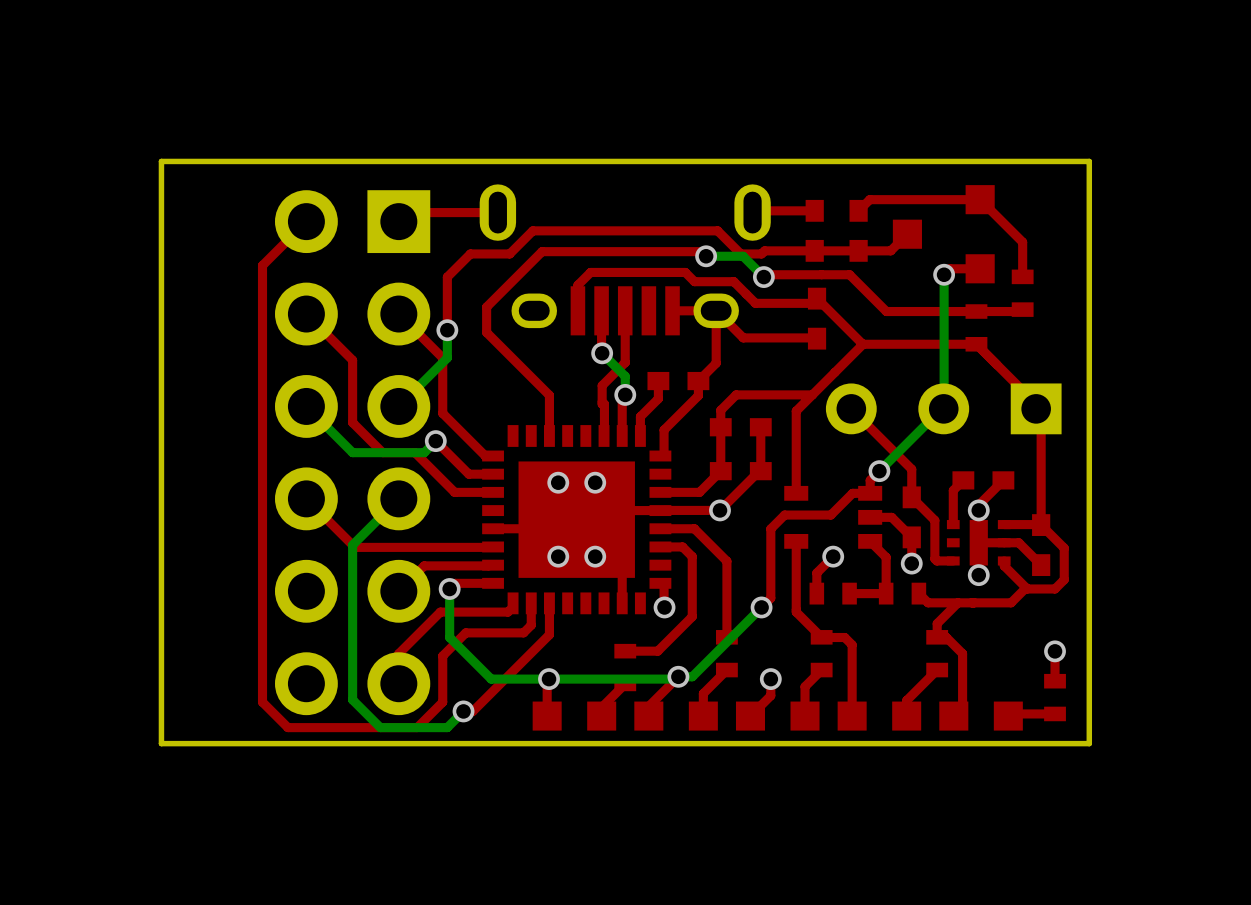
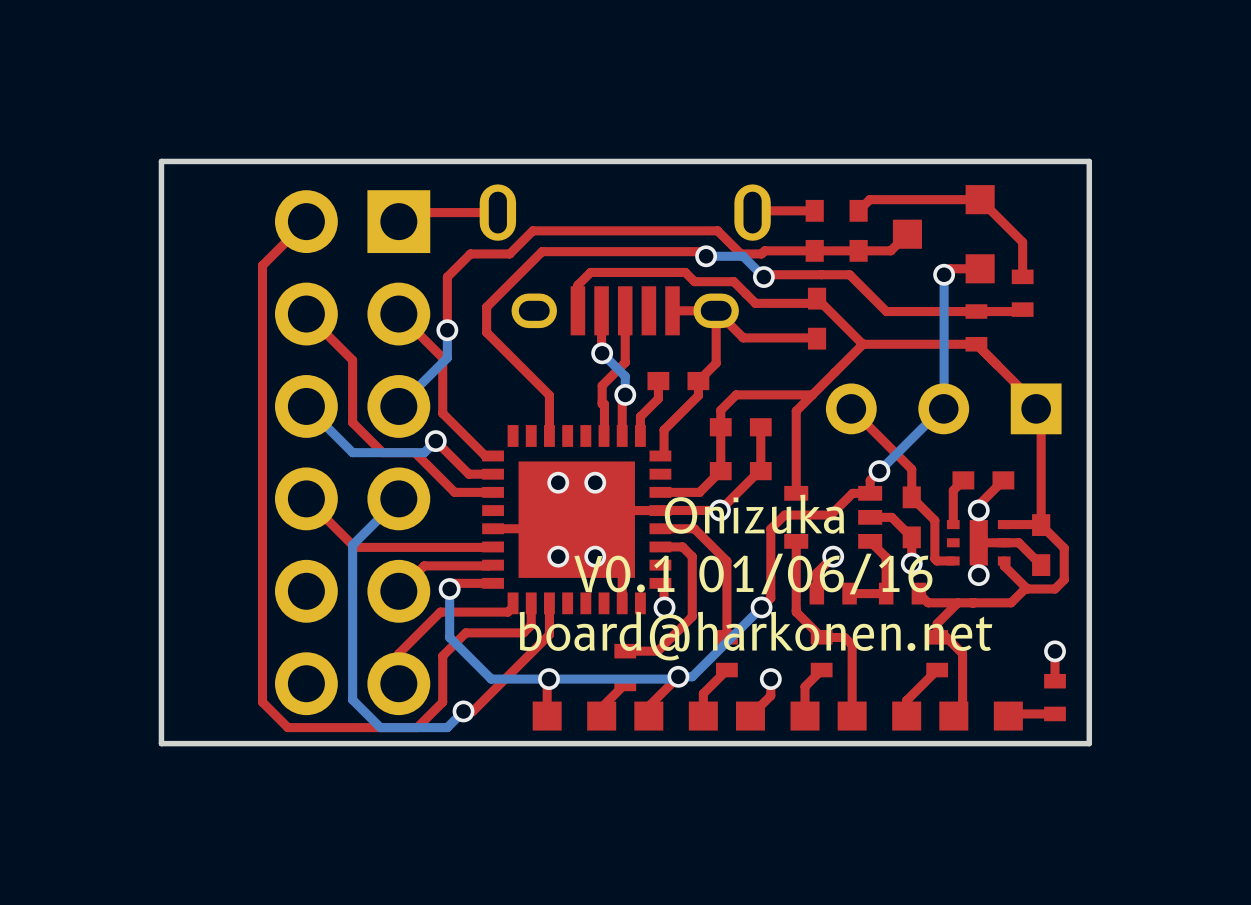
text: none -> Onizuka (754, 514)
text: none -> V0.1 01/06/16 (753, 574)
text: none -> board@harkonen.net (755, 636)

